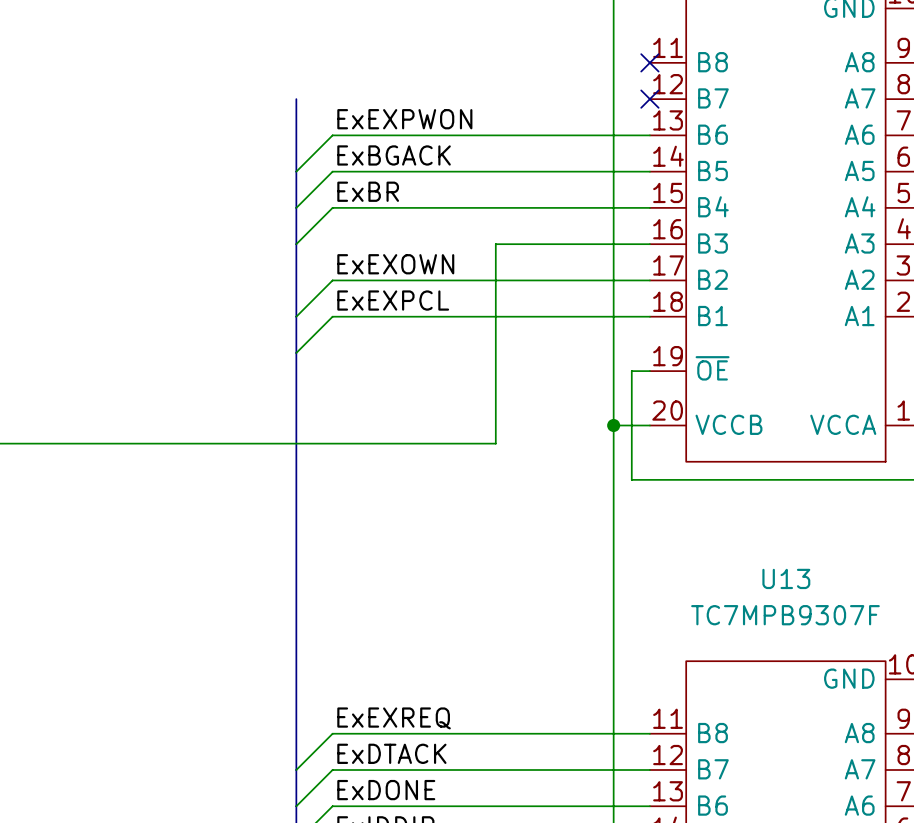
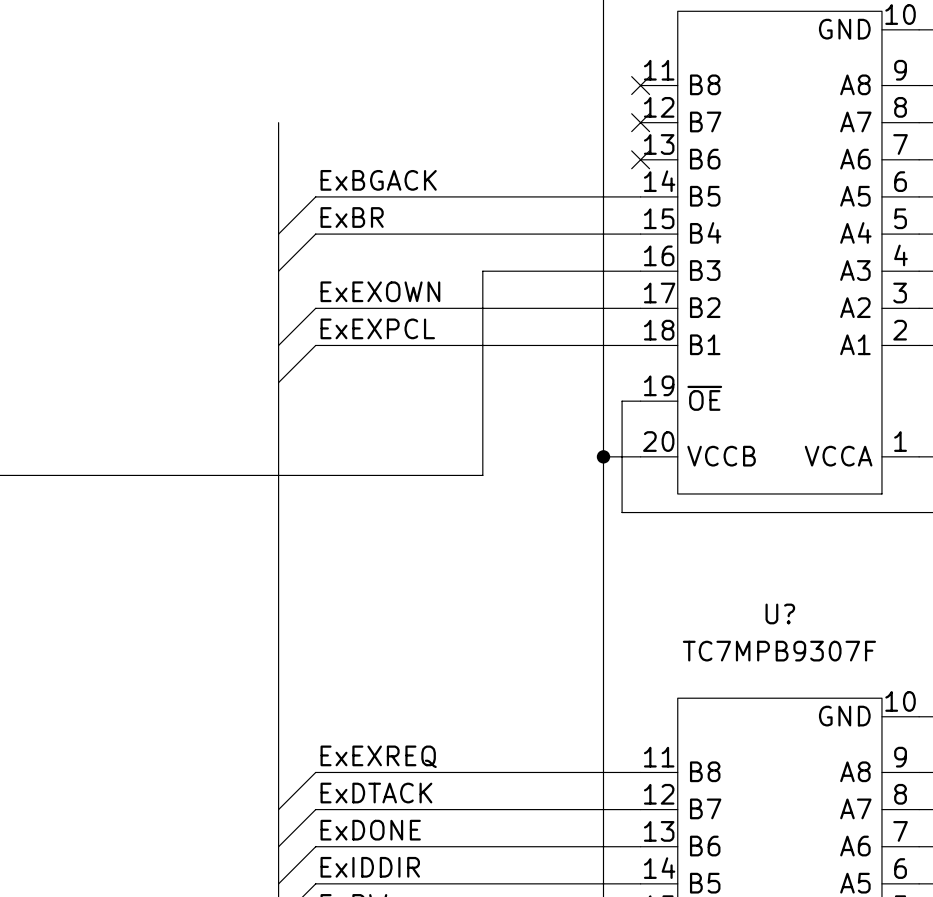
label: ExEXPWON (404, 119) -> none
wire: (649, 135) (332, 135) (296, 171) -> none
no-connect mark: none -> (640, 159)
U13 name: U13 (786, 578) -> U? (780, 613)

